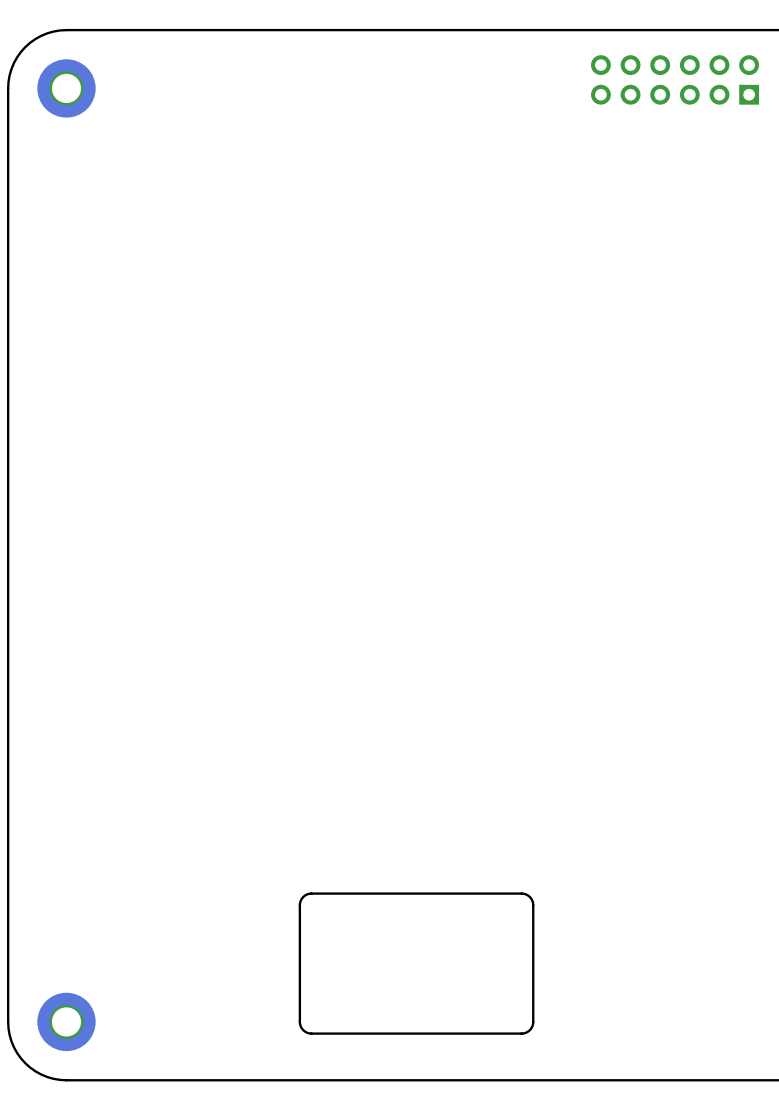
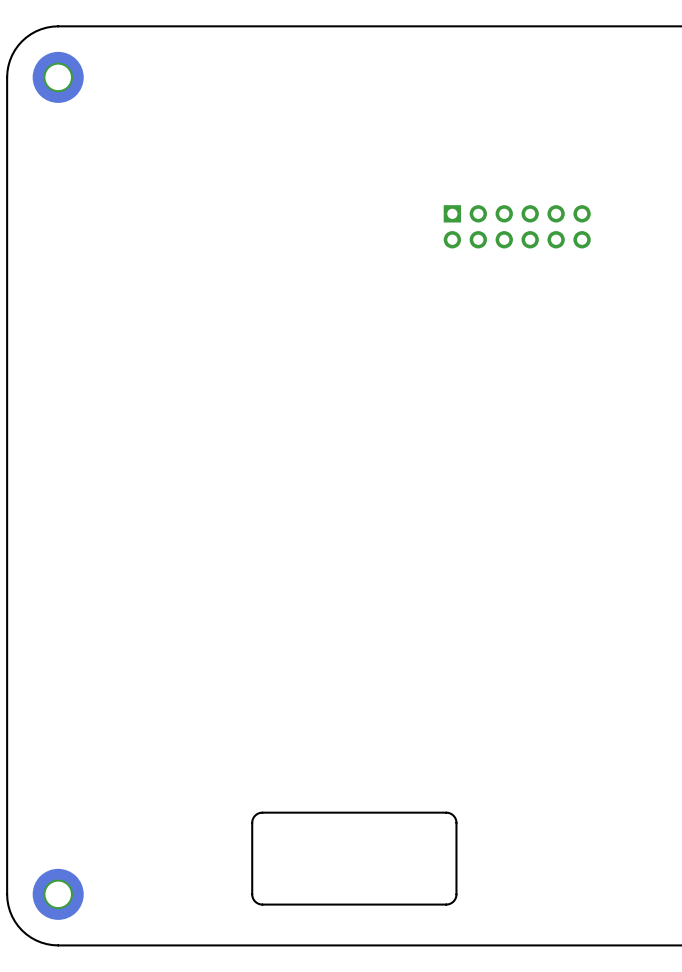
part rotation: 0° (675, 79) -> 180° (517, 226)
part position: (675, 79) -> (517, 226)
board edge: (509, 1033) (526, 1032) (533, 1023) (533, 903) (529, 896) (522, 893) (311, 893) (305, 895) (299, 905) (299, 1021) (303, 1030) (311, 1033) -> (446, 904) (453, 901) (456, 894) (456, 821) (450, 813) (261, 812) (255, 815) (252, 821) (252, 895) (258, 903) (272, 904)

